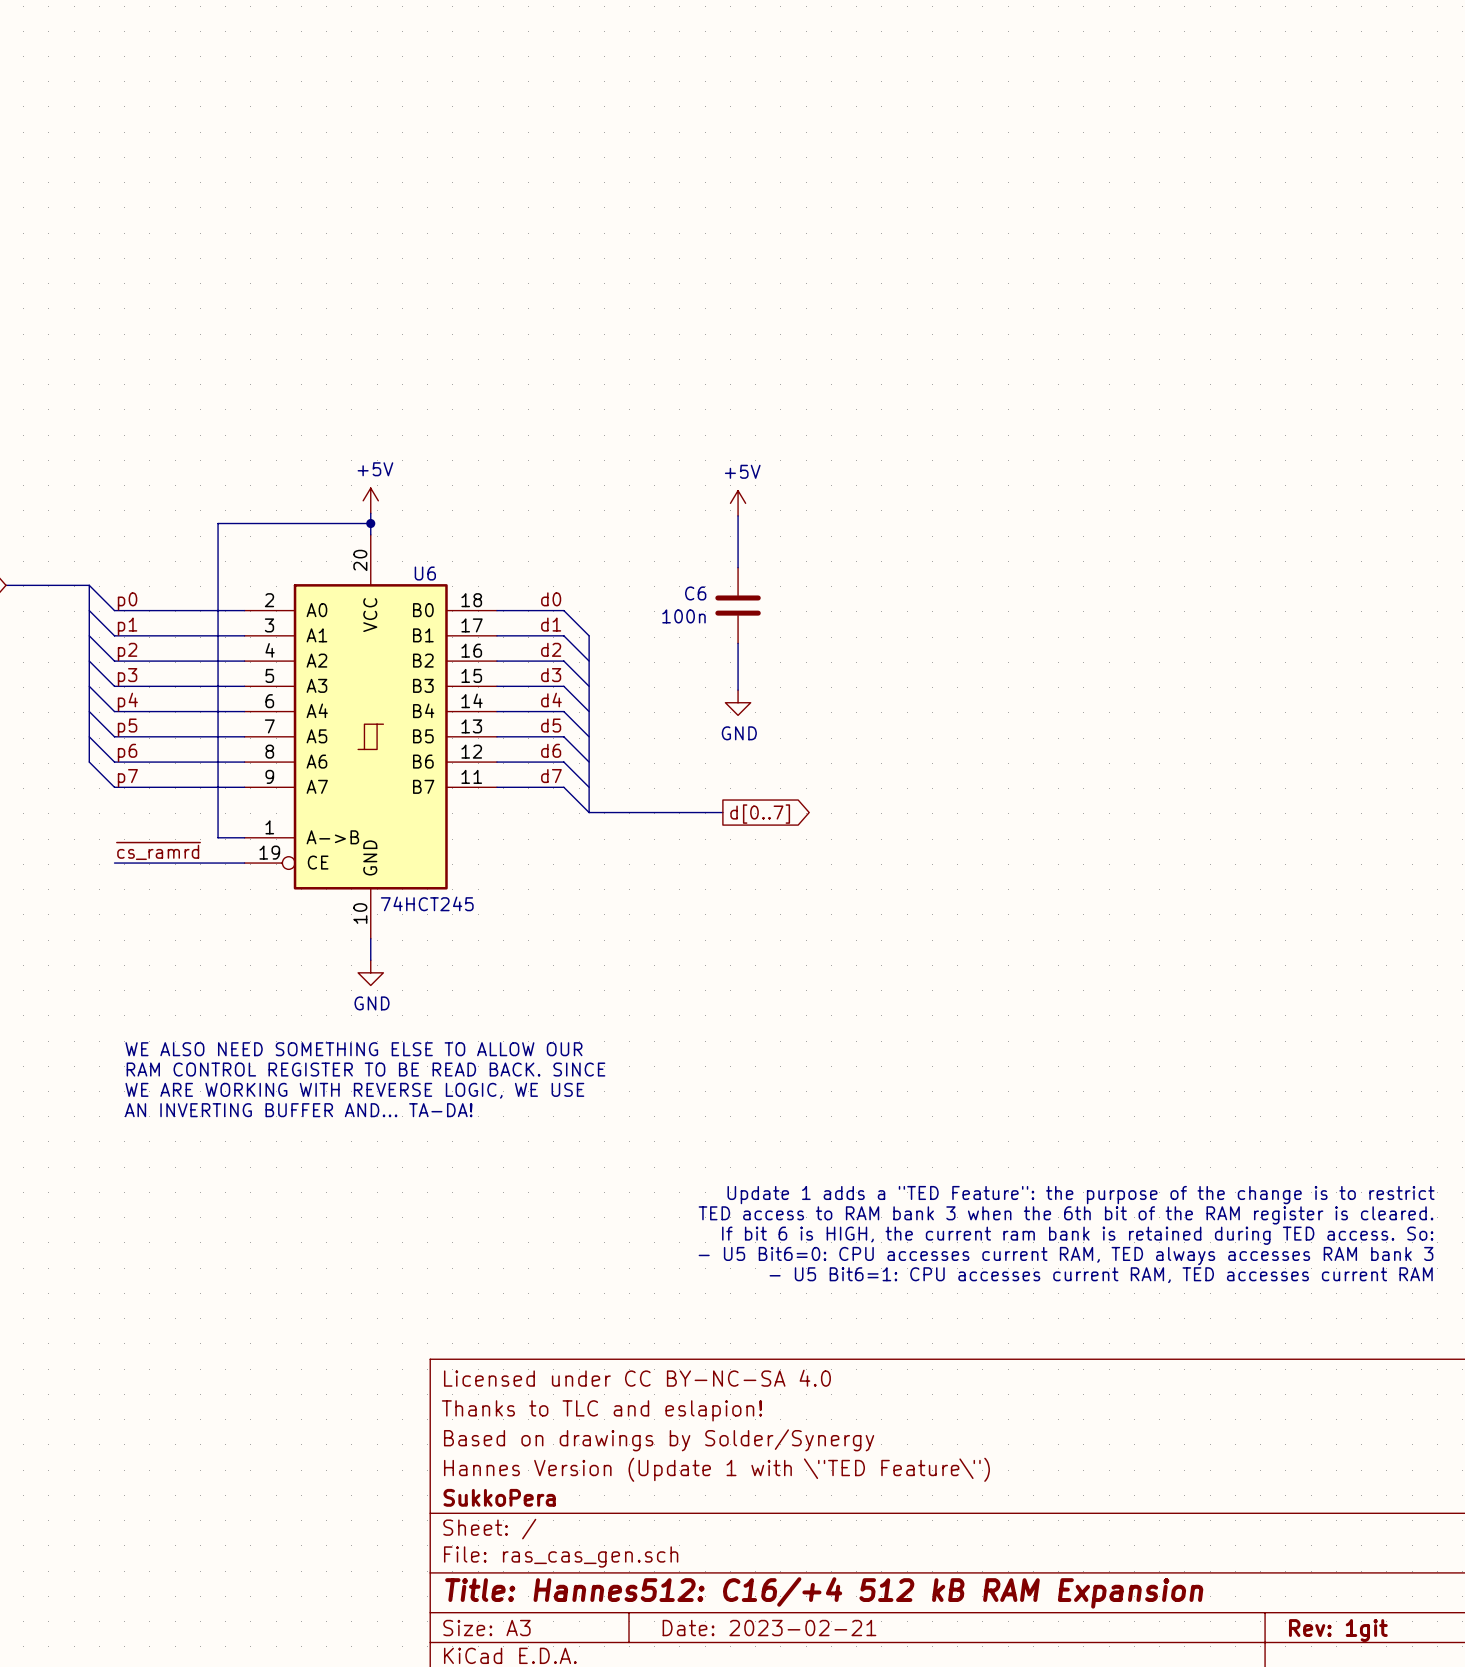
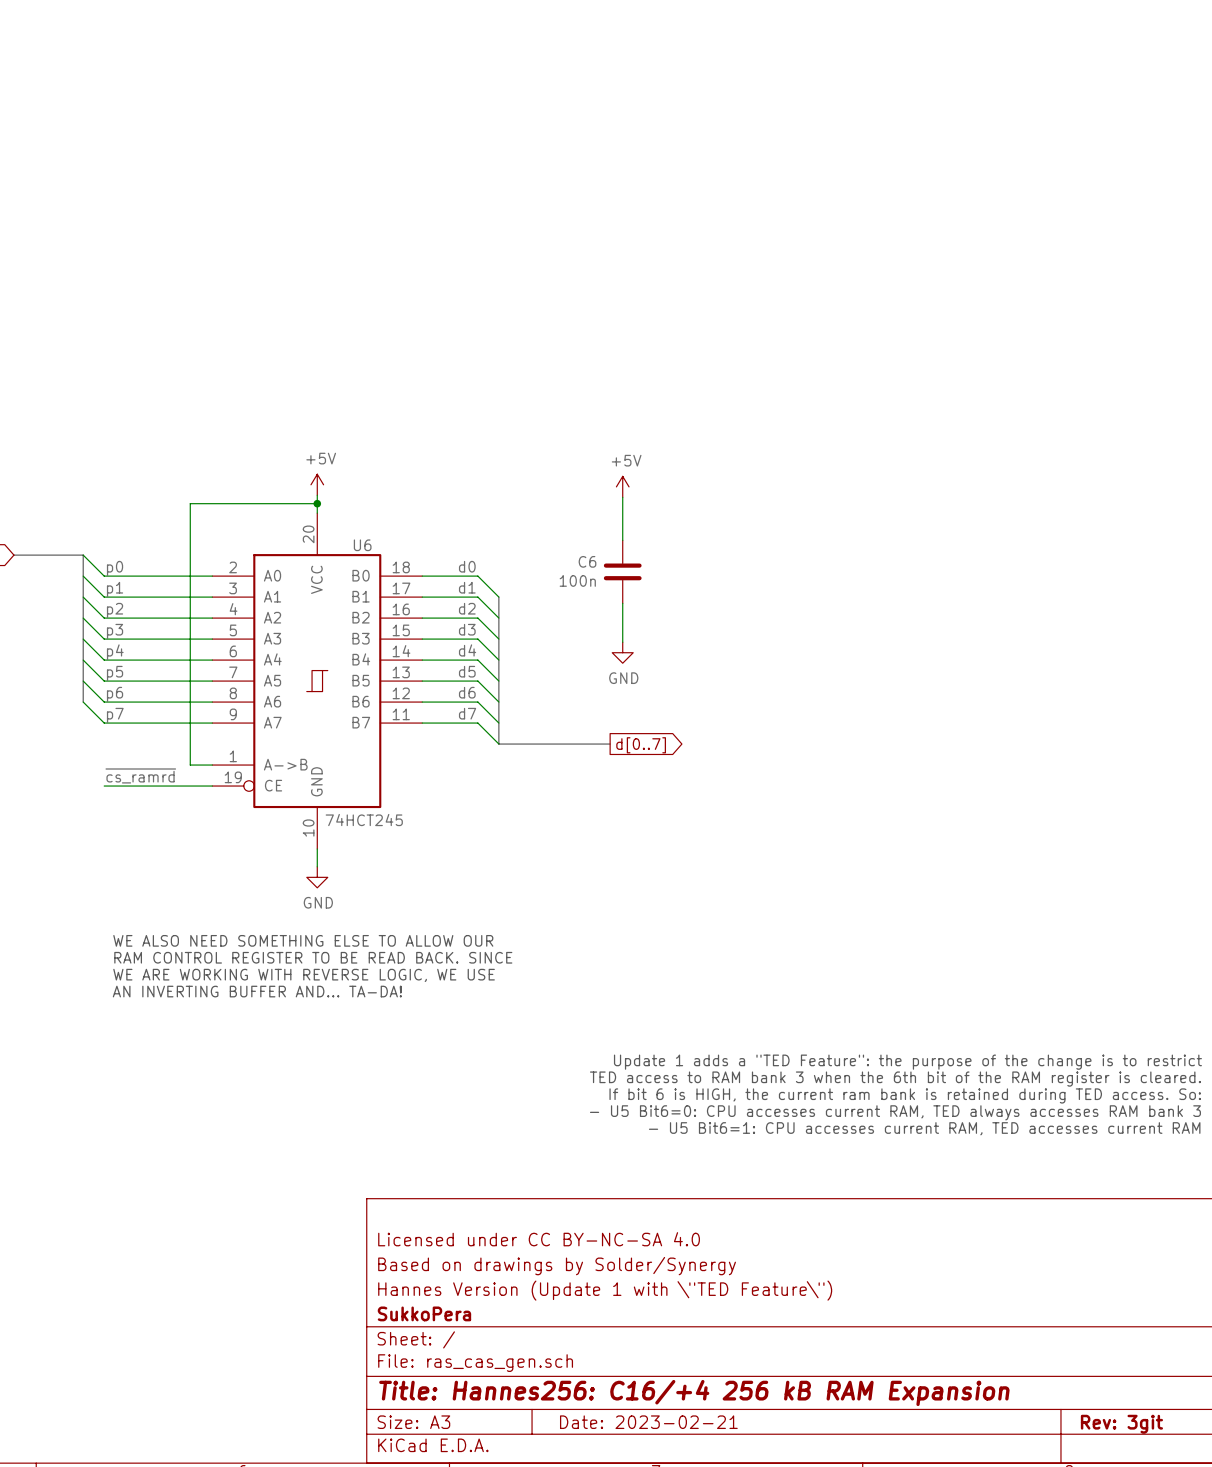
title block: Licensed under CC BY-NC-SA 4.0 (637, 1378) -> none
title block: Thanks to TLC and eslapion! (601, 1410) -> Licensed under CC BY-NC-SA 4.0 (539, 1239)
title block: Title: Hannes512: C16/+4 512 kB RAM Expansion (824, 1592) -> Title: Hannes256: C16/+4 256 kB RAM Expansion (694, 1392)
title block: Rev: 1git (1338, 1630) -> Rev: 3git (1121, 1424)

